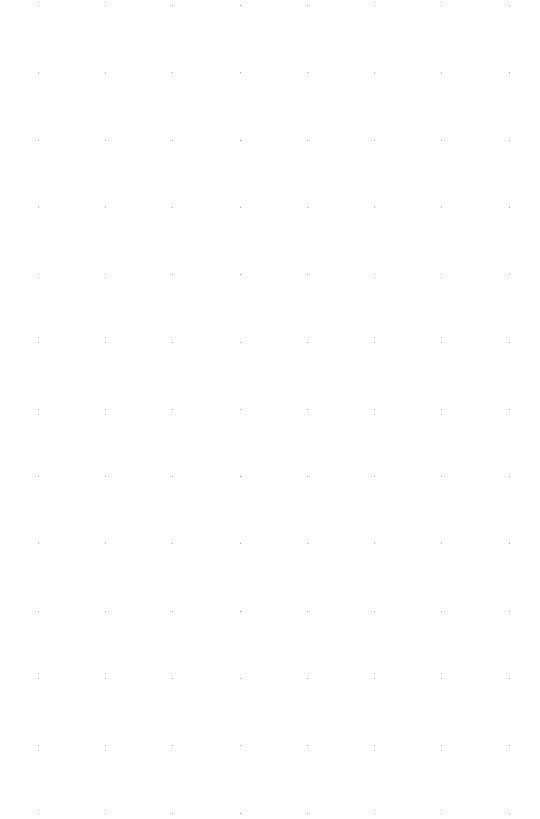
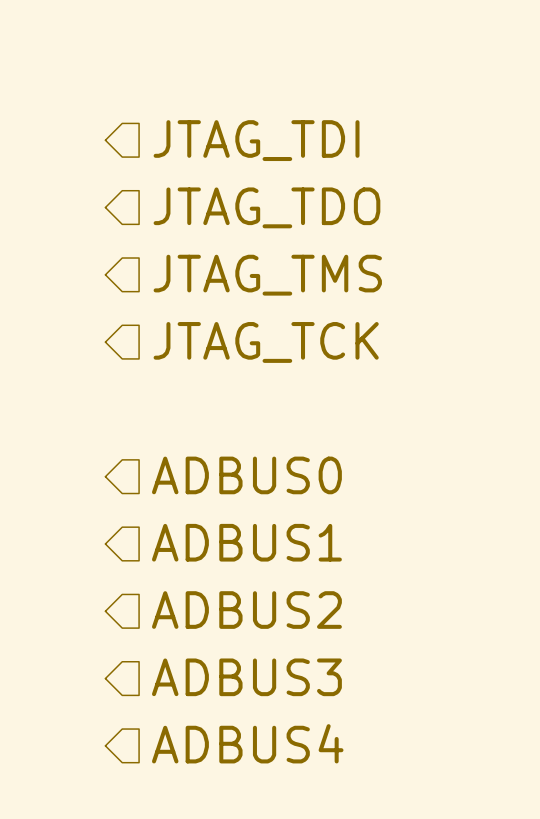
hierarchical label: none -> JTAG_TDI (256, 140)
hierarchical label: none -> JTAG_TDO (266, 207)
hierarchical label: none -> JTAG_TMS (267, 275)
hierarchical label: none -> JTAG_TCK (266, 342)
hierarchical label: none -> ADBUS0 (246, 475)
hierarchical label: none -> ADBUS1 (246, 542)
hierarchical label: none -> ADBUS2 (246, 610)
hierarchical label: none -> ADBUS3 (246, 677)
hierarchical label: none -> ADBUS4 (247, 743)

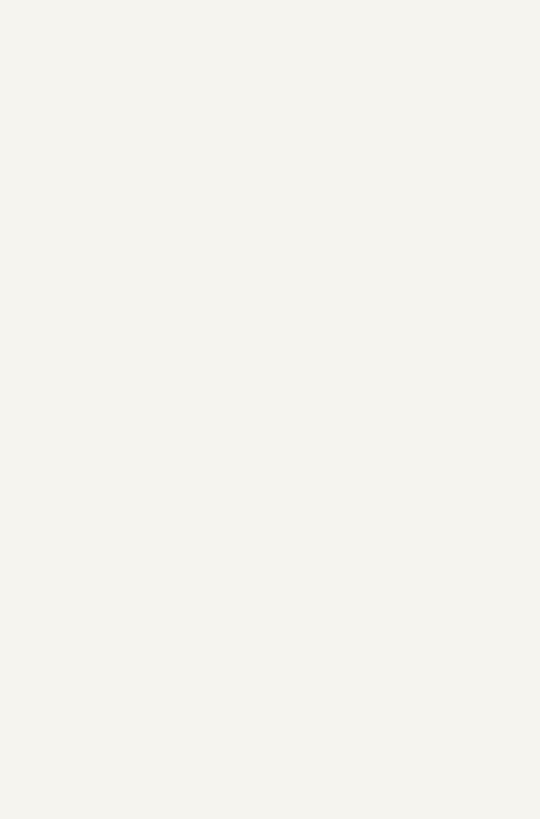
hierarchical label: JTAG_TDI (256, 140) -> none
hierarchical label: JTAG_TDO (266, 207) -> none
hierarchical label: JTAG_TMS (267, 275) -> none
hierarchical label: JTAG_TCK (266, 342) -> none
hierarchical label: ADBUS0 (246, 475) -> none
hierarchical label: ADBUS1 (246, 542) -> none
hierarchical label: ADBUS2 (246, 610) -> none
hierarchical label: ADBUS3 (246, 677) -> none
hierarchical label: ADBUS4 (247, 743) -> none

